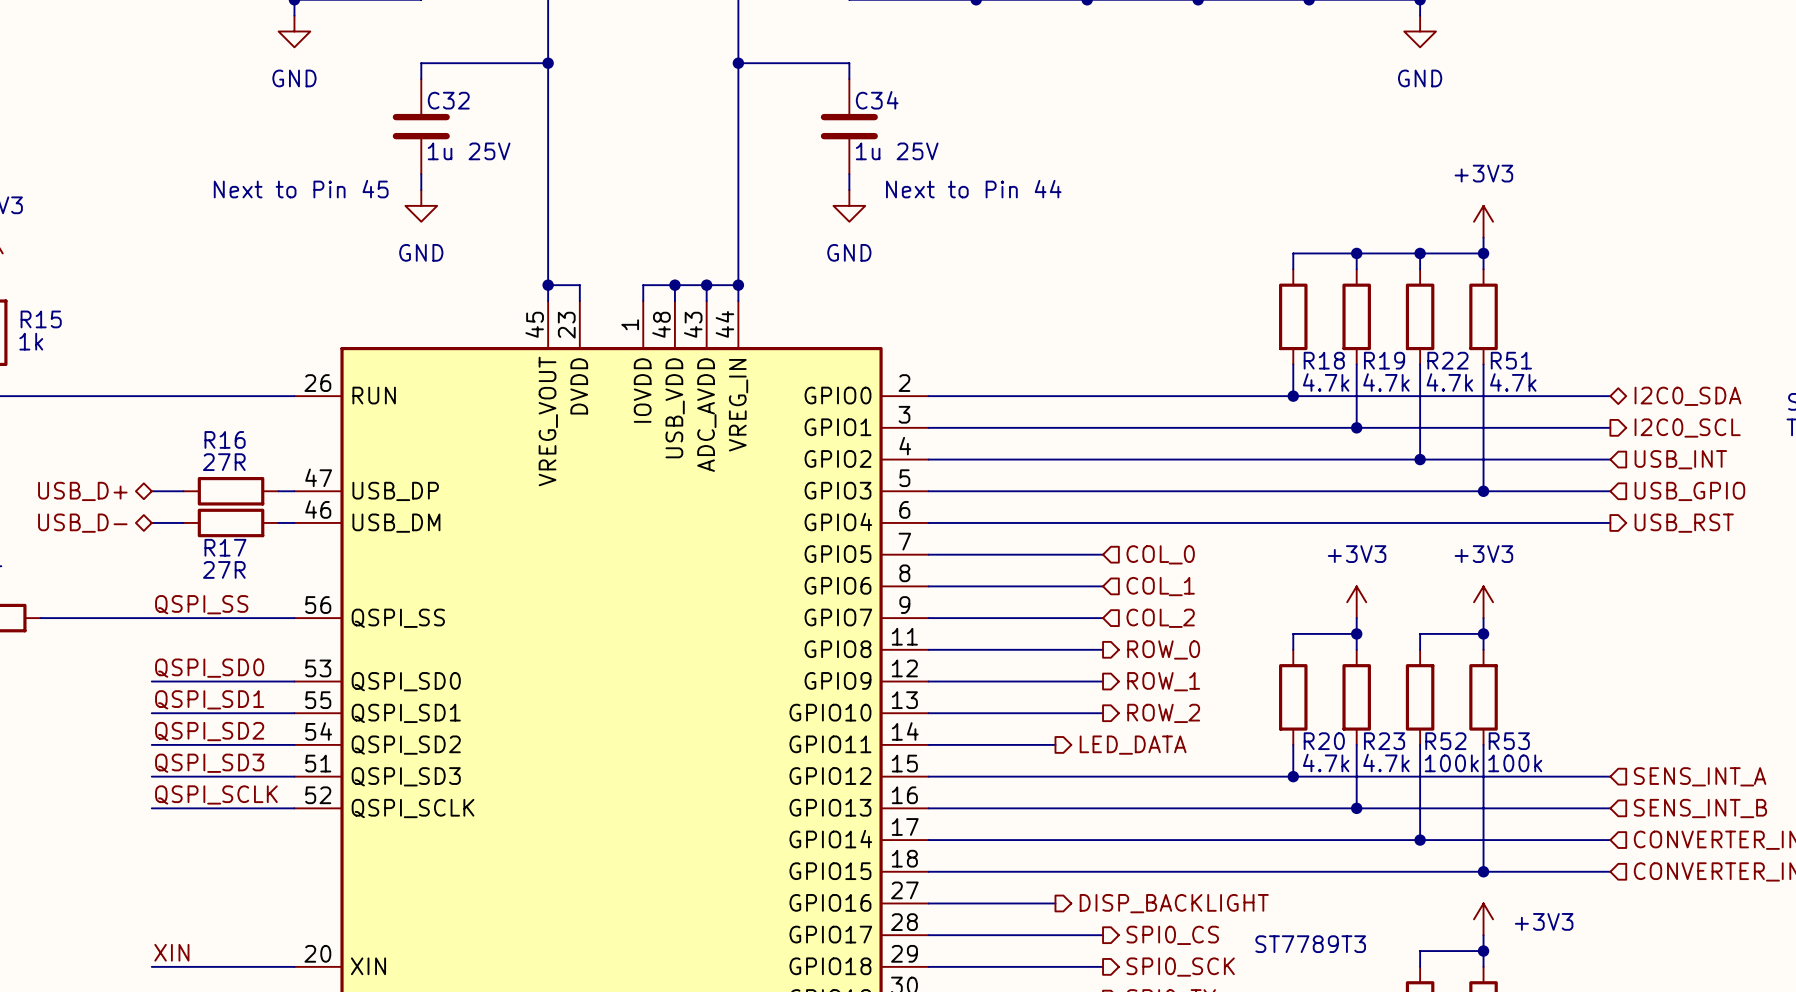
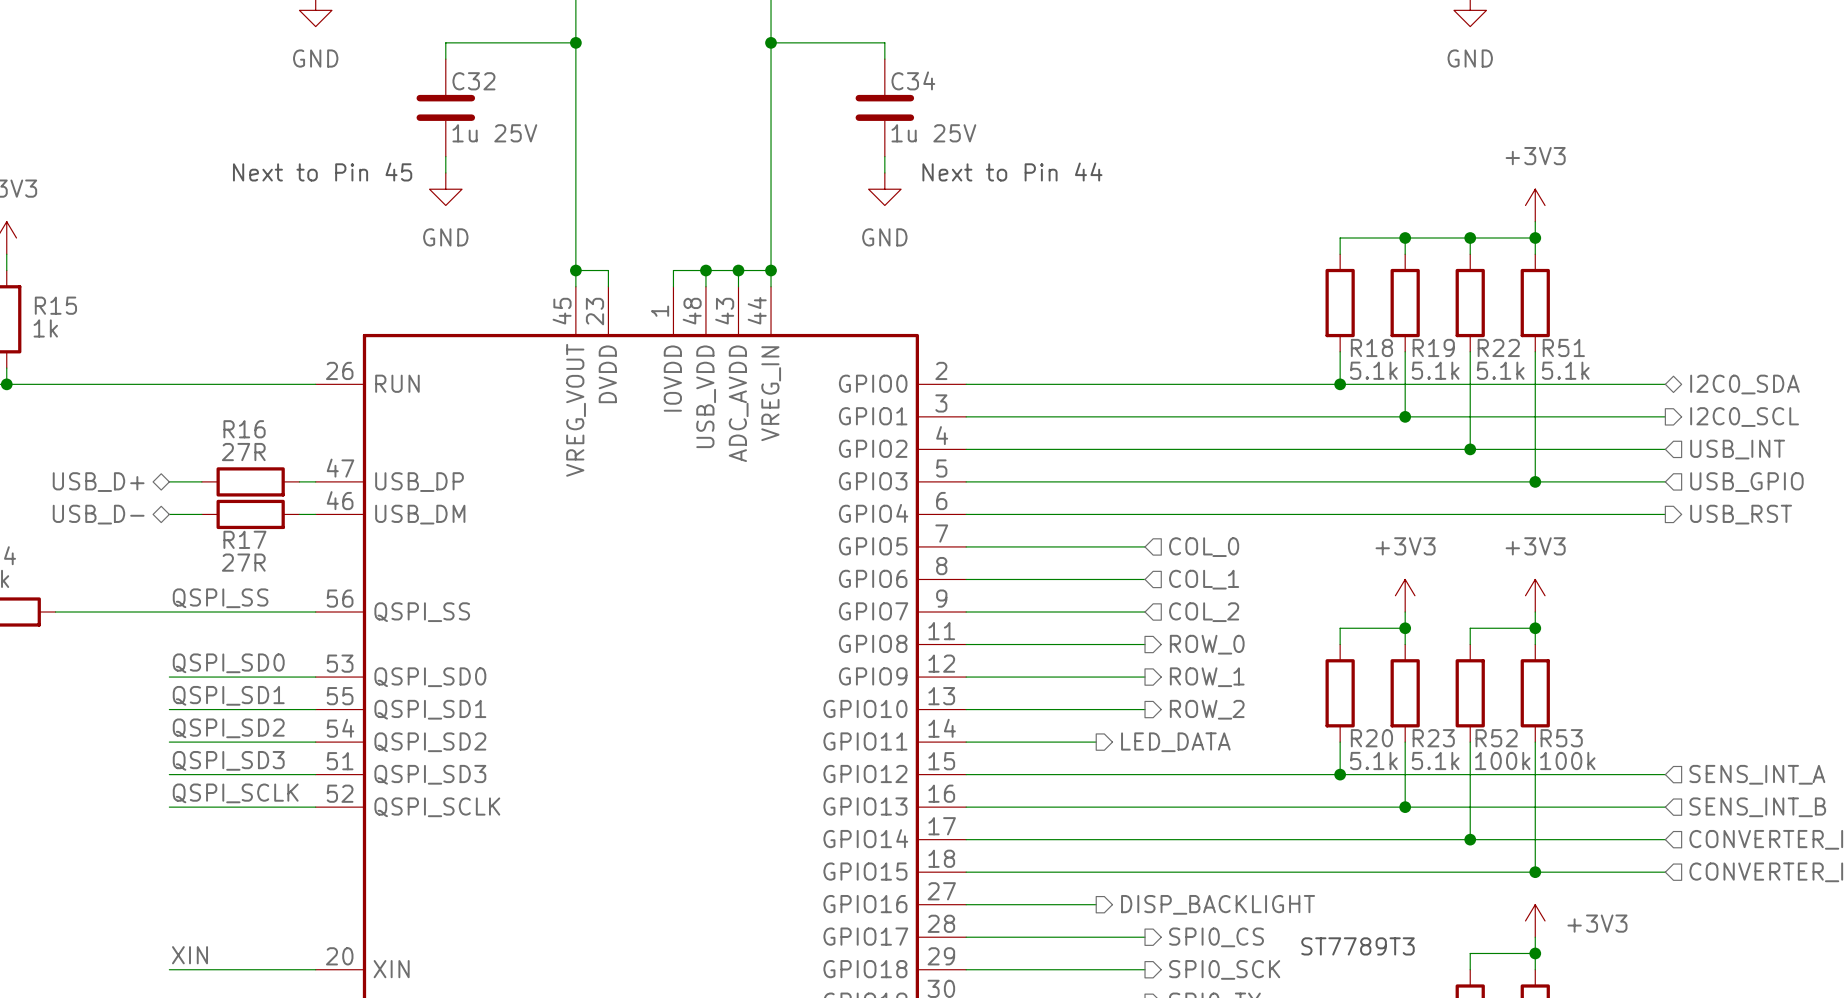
R18 value: 4.7k (1326, 382) -> 5.1k (1373, 370)
R19 value: 4.7k (1386, 382) -> 5.1k (1435, 370)
R22 value: 4.7k (1449, 382) -> 5.1k (1500, 370)
R51 value: 4.7k (1513, 382) -> 5.1k (1565, 370)
R20 value: 4.7k (1326, 762) -> 5.1k (1373, 760)
R23 value: 4.7k (1386, 762) -> 5.1k (1435, 760)

